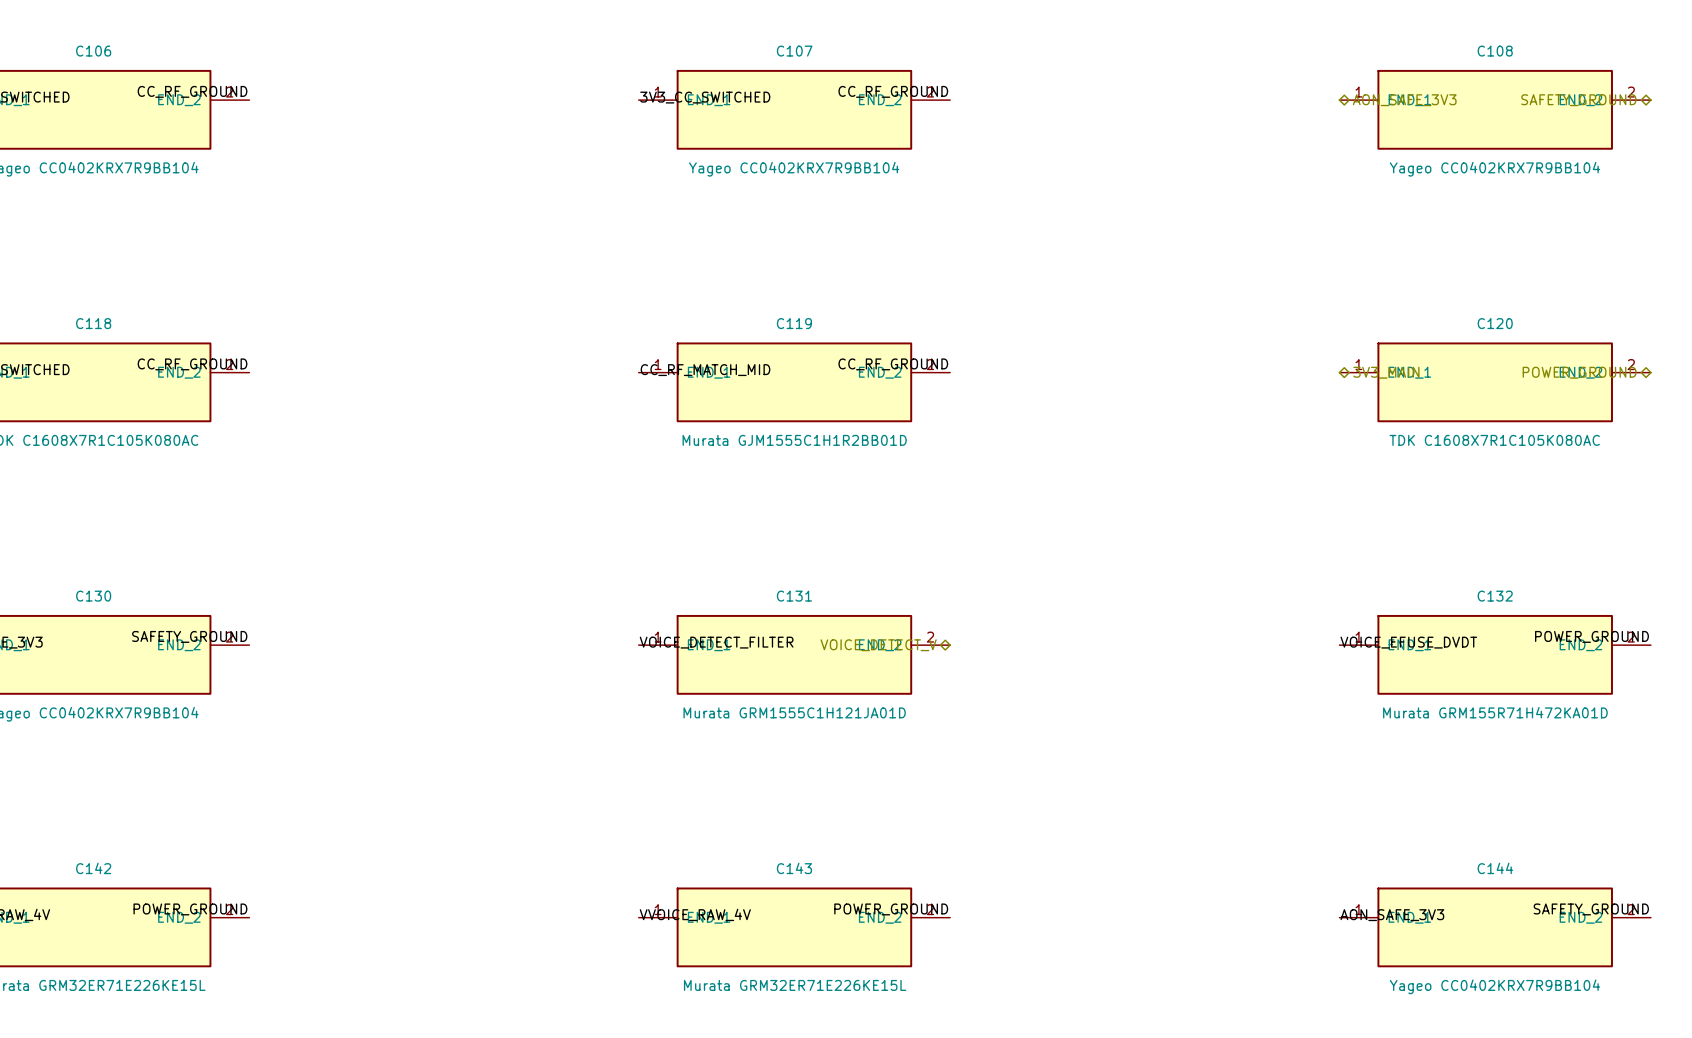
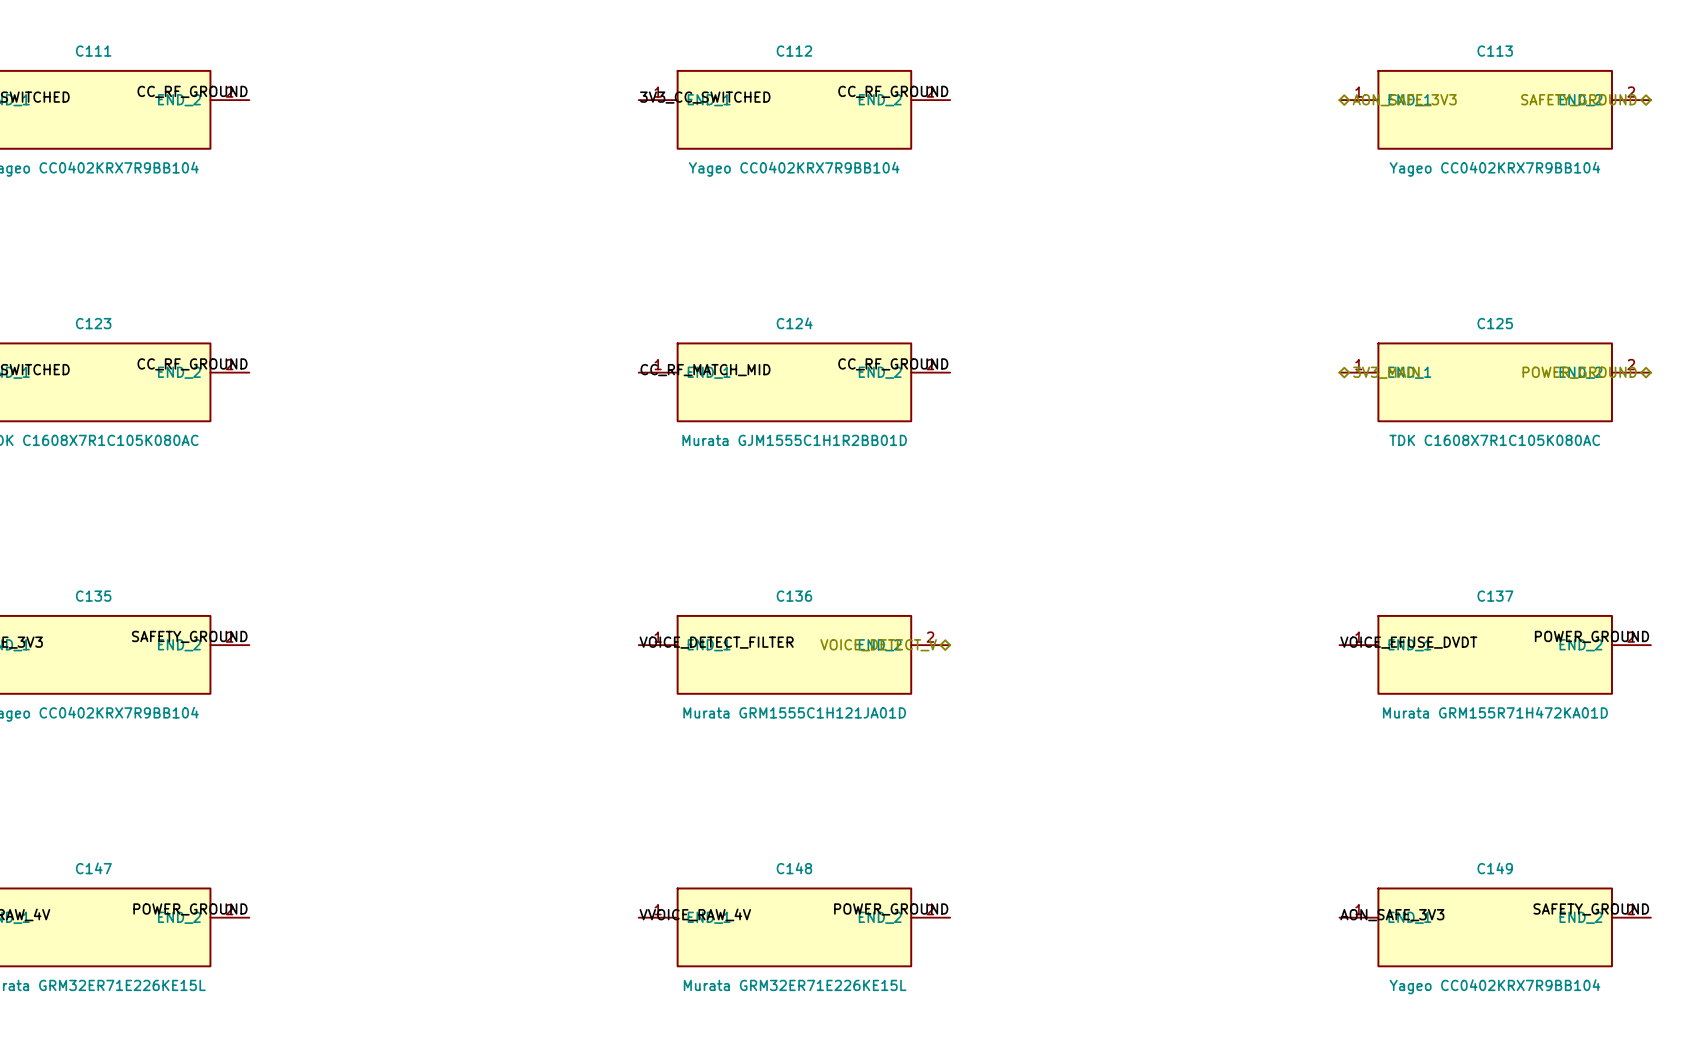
C106 name: C106 (93, 51) -> C111 (93, 51)
C107 name: C107 (794, 51) -> C112 (794, 51)
C108 name: C108 (1495, 51) -> C113 (1495, 51)
C118 name: C118 (93, 323) -> C123 (93, 323)
C119 name: C119 (794, 323) -> C124 (794, 323)
C120 name: C120 (1495, 323) -> C125 (1495, 323)
C130 name: C130 (93, 596) -> C135 (93, 596)
C131 name: C131 (794, 596) -> C136 (794, 596)
C132 name: C132 (1495, 596) -> C137 (1495, 596)
C142 name: C142 (93, 868) -> C147 (93, 868)
C143 name: C143 (794, 868) -> C148 (794, 868)
C144 name: C144 (1495, 868) -> C149 (1495, 868)

